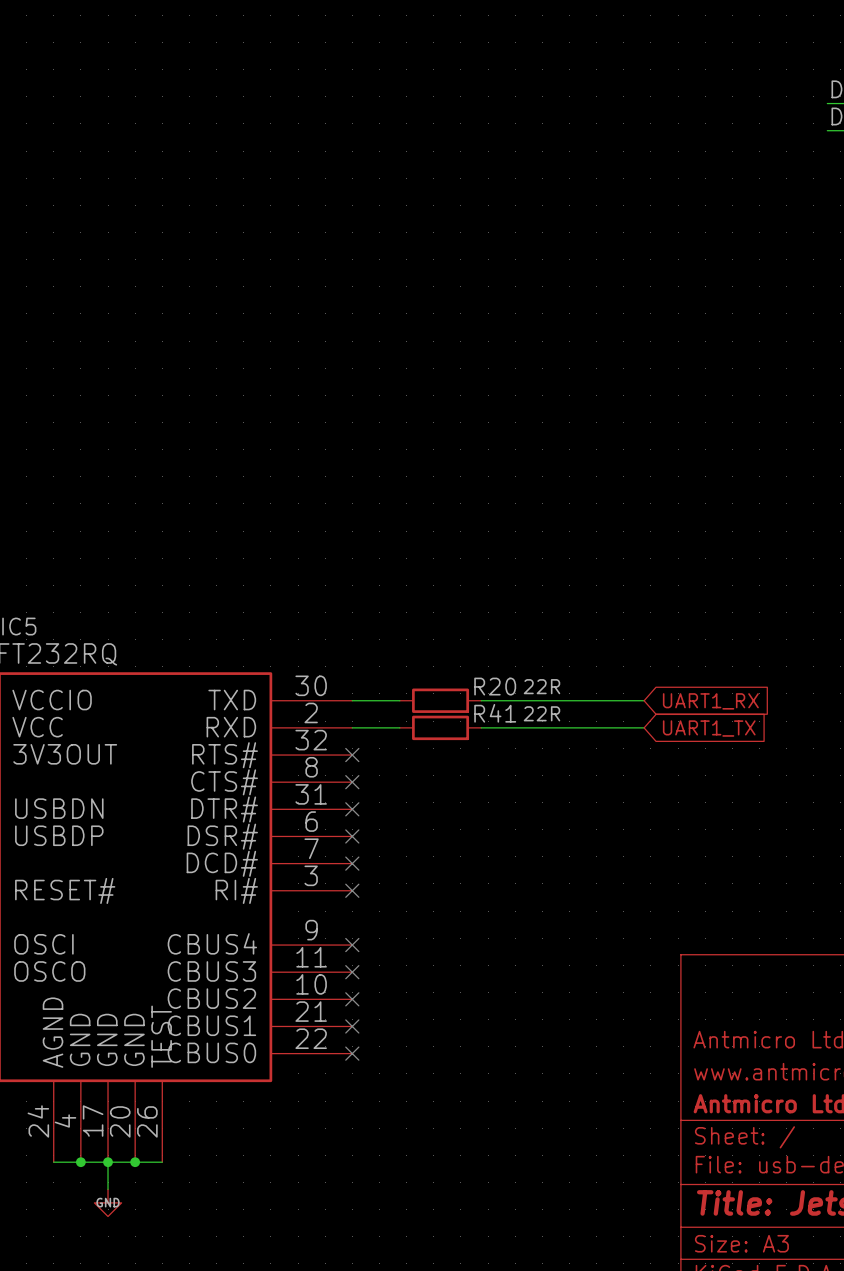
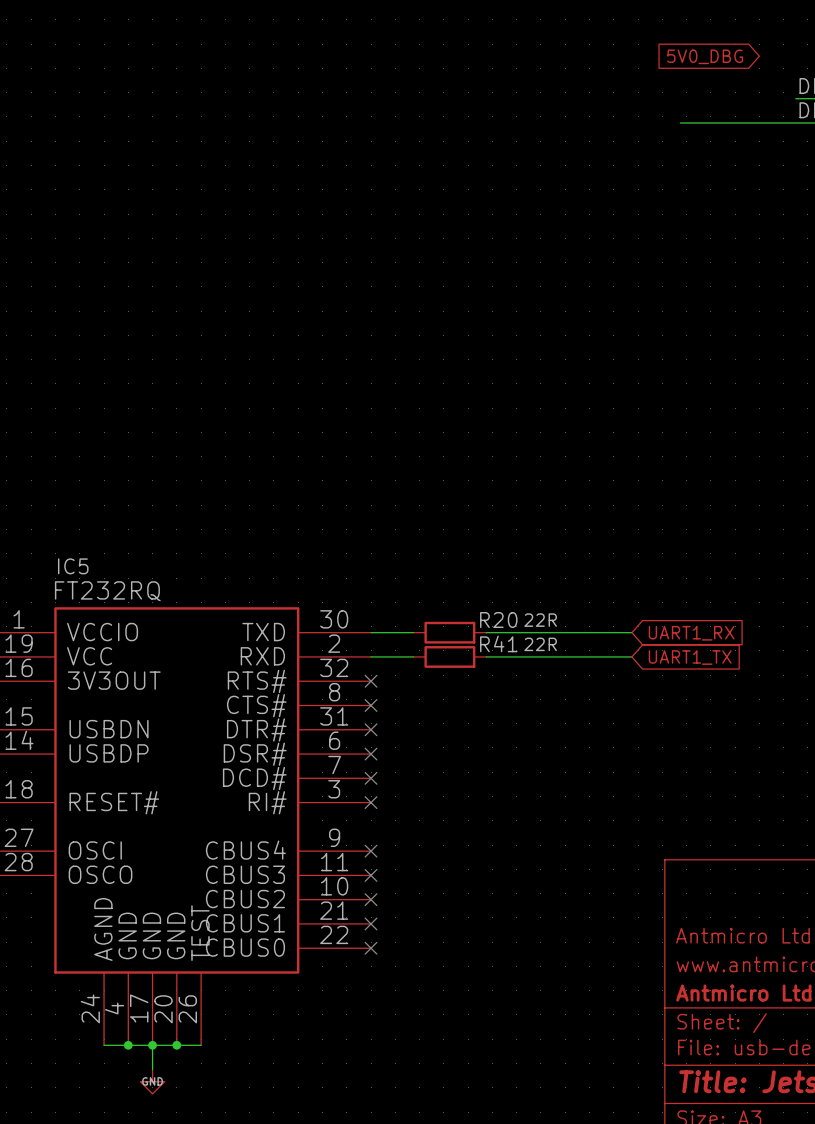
global label: none -> 5V0_DBG (705, 56)
wire: none -> (680, 122) (795, 122)

